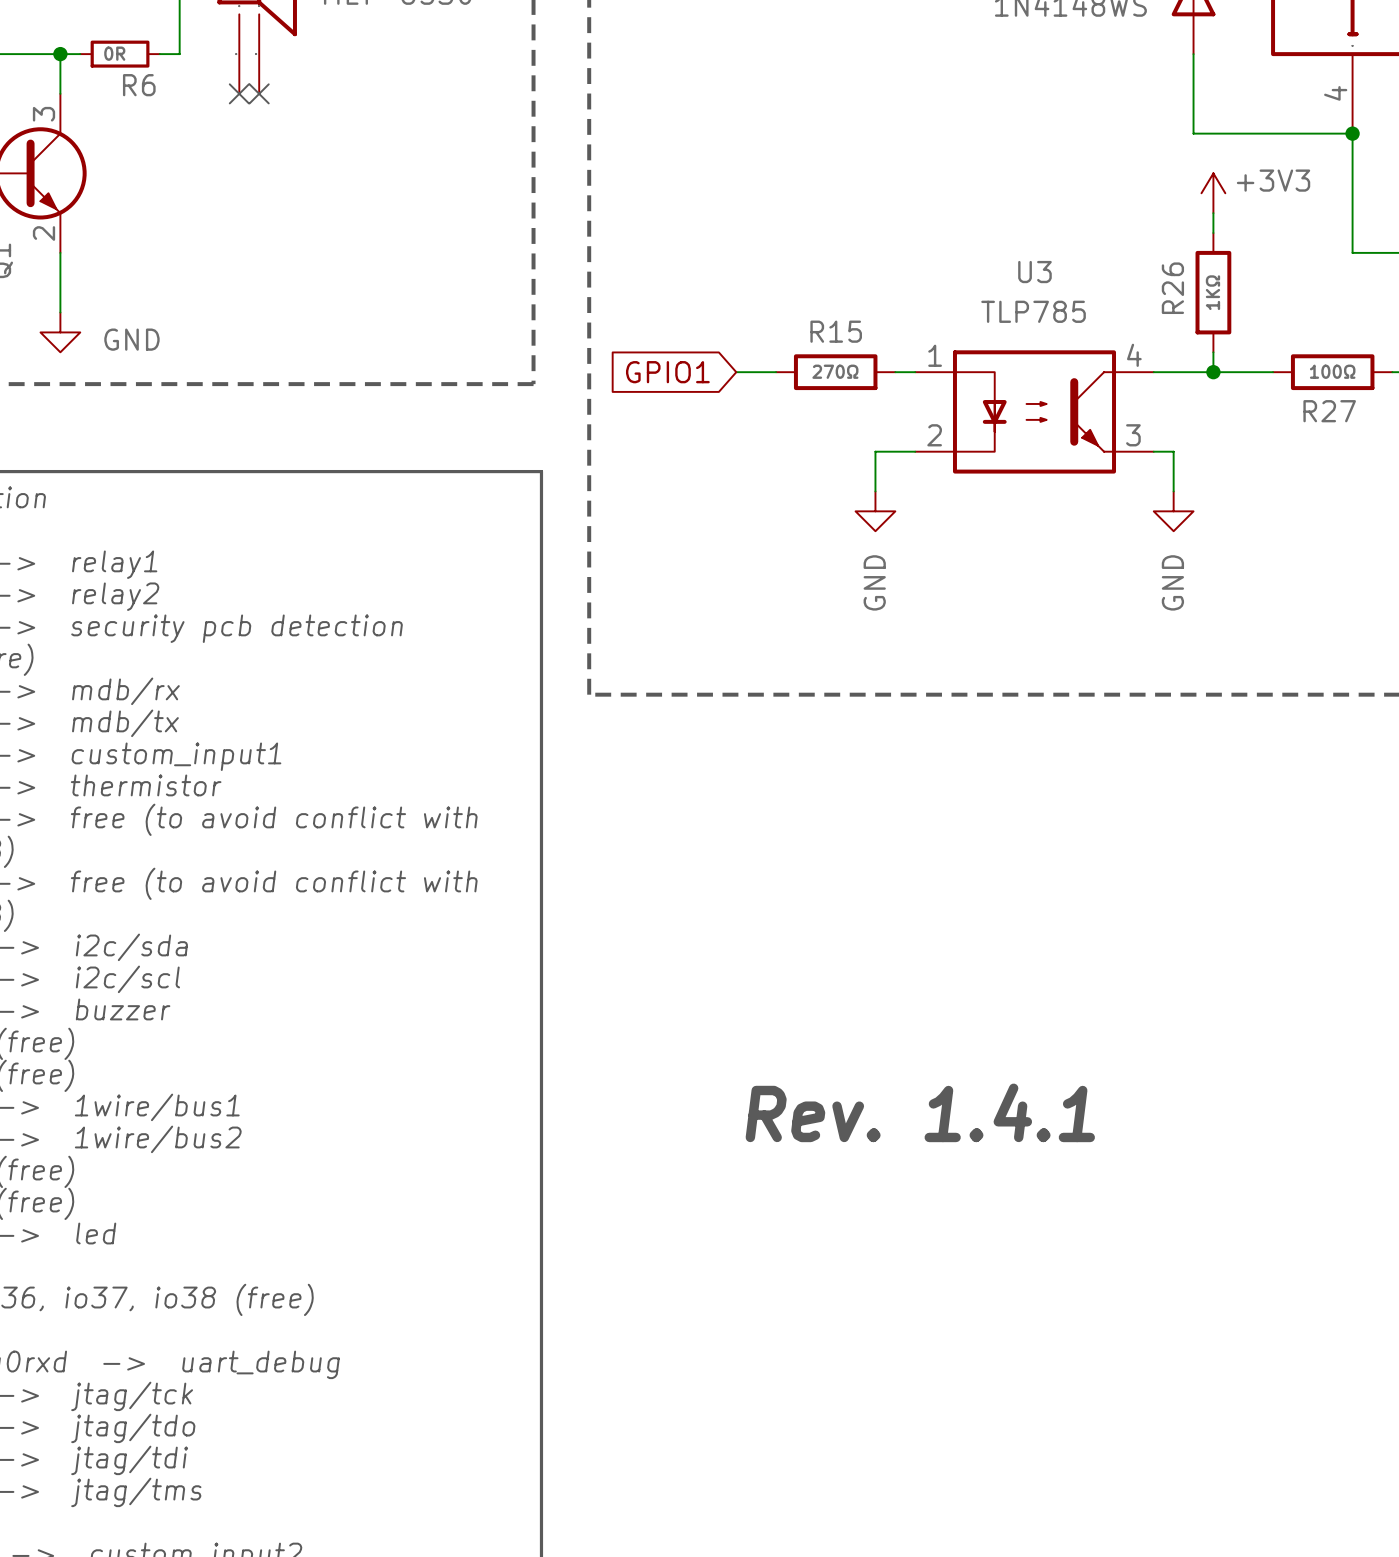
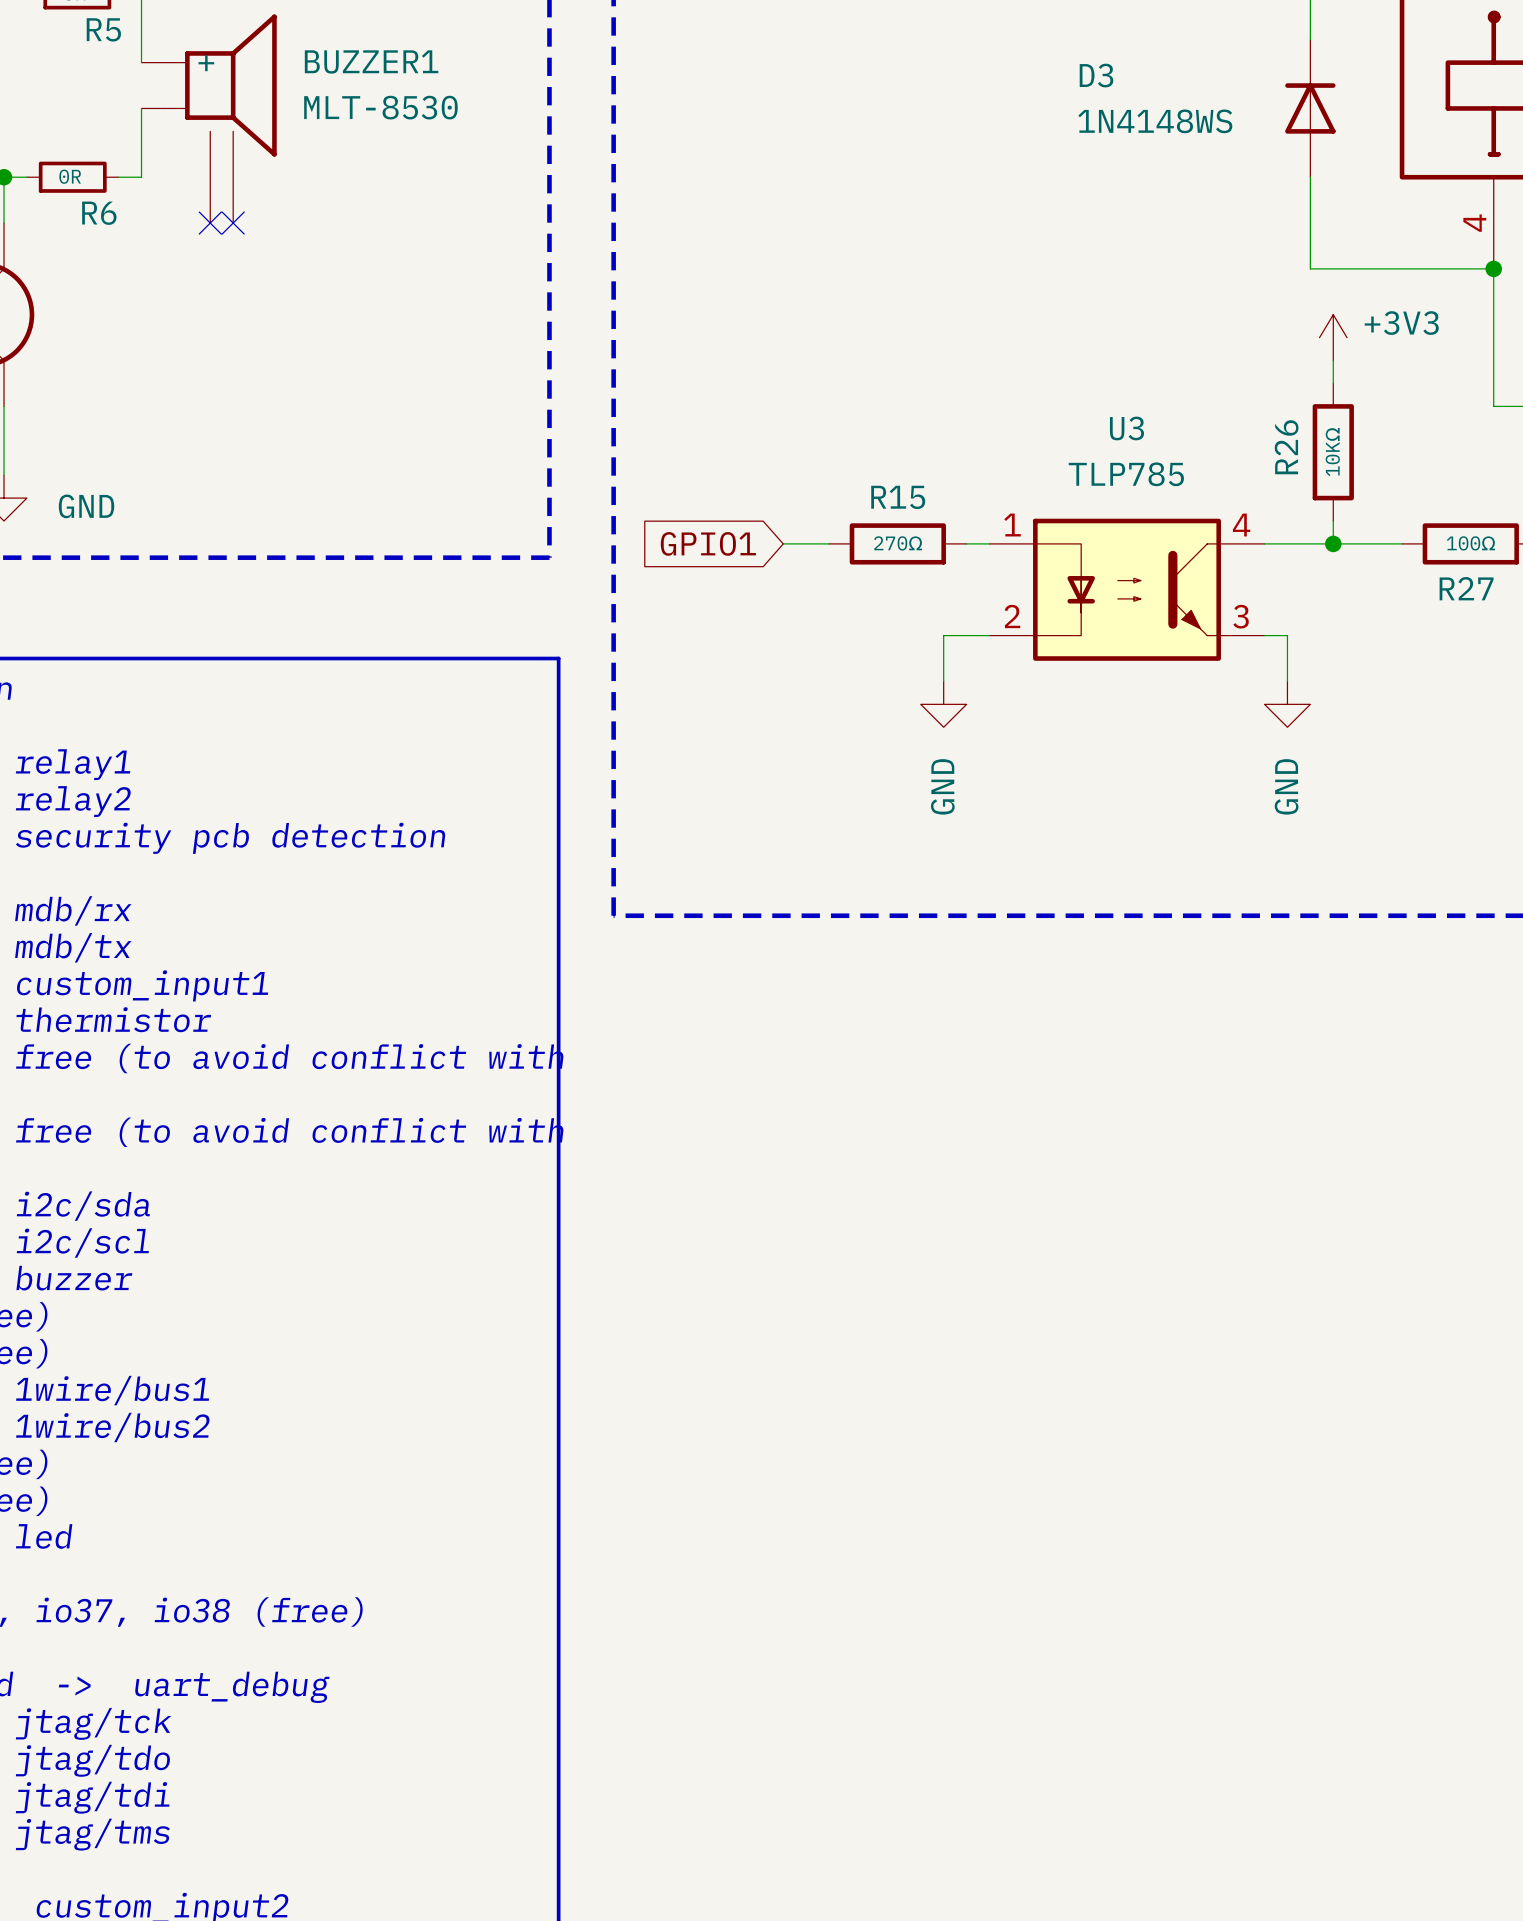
R26 value: 1KΩ (1212, 292) -> 10KΩ (1332, 452)
text: Rev. 1.4.1 (920, 1112) -> none

